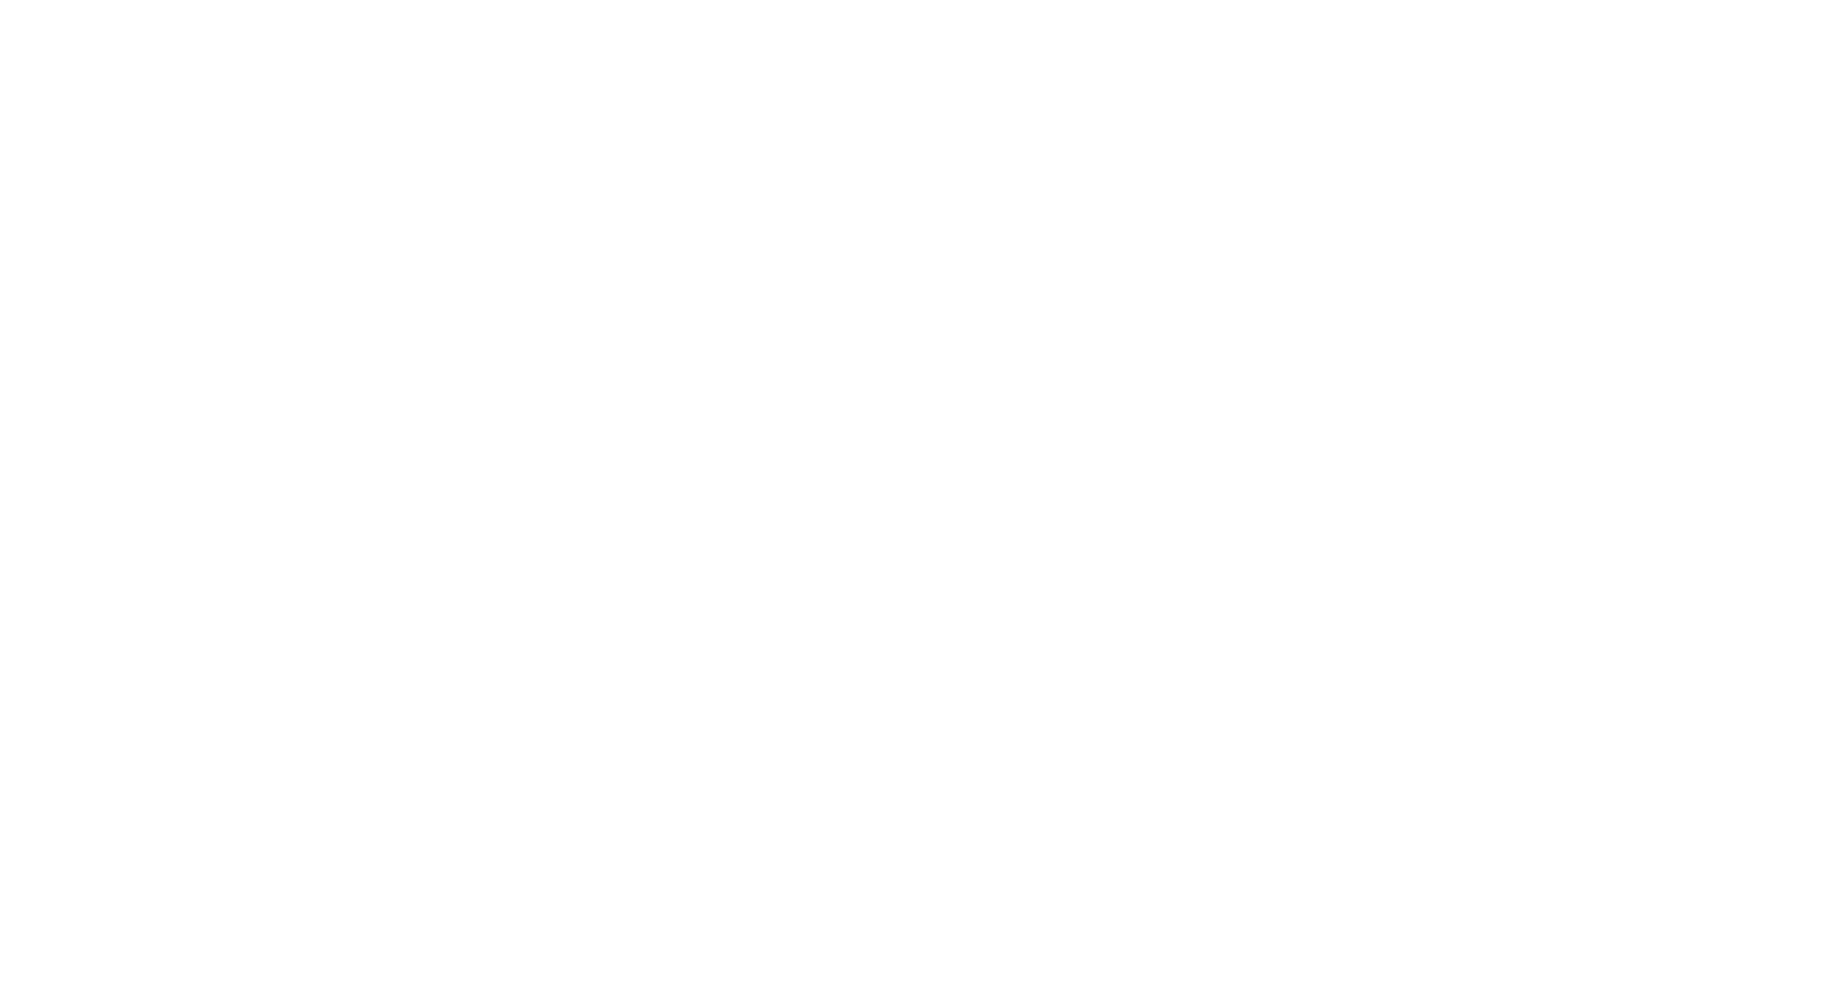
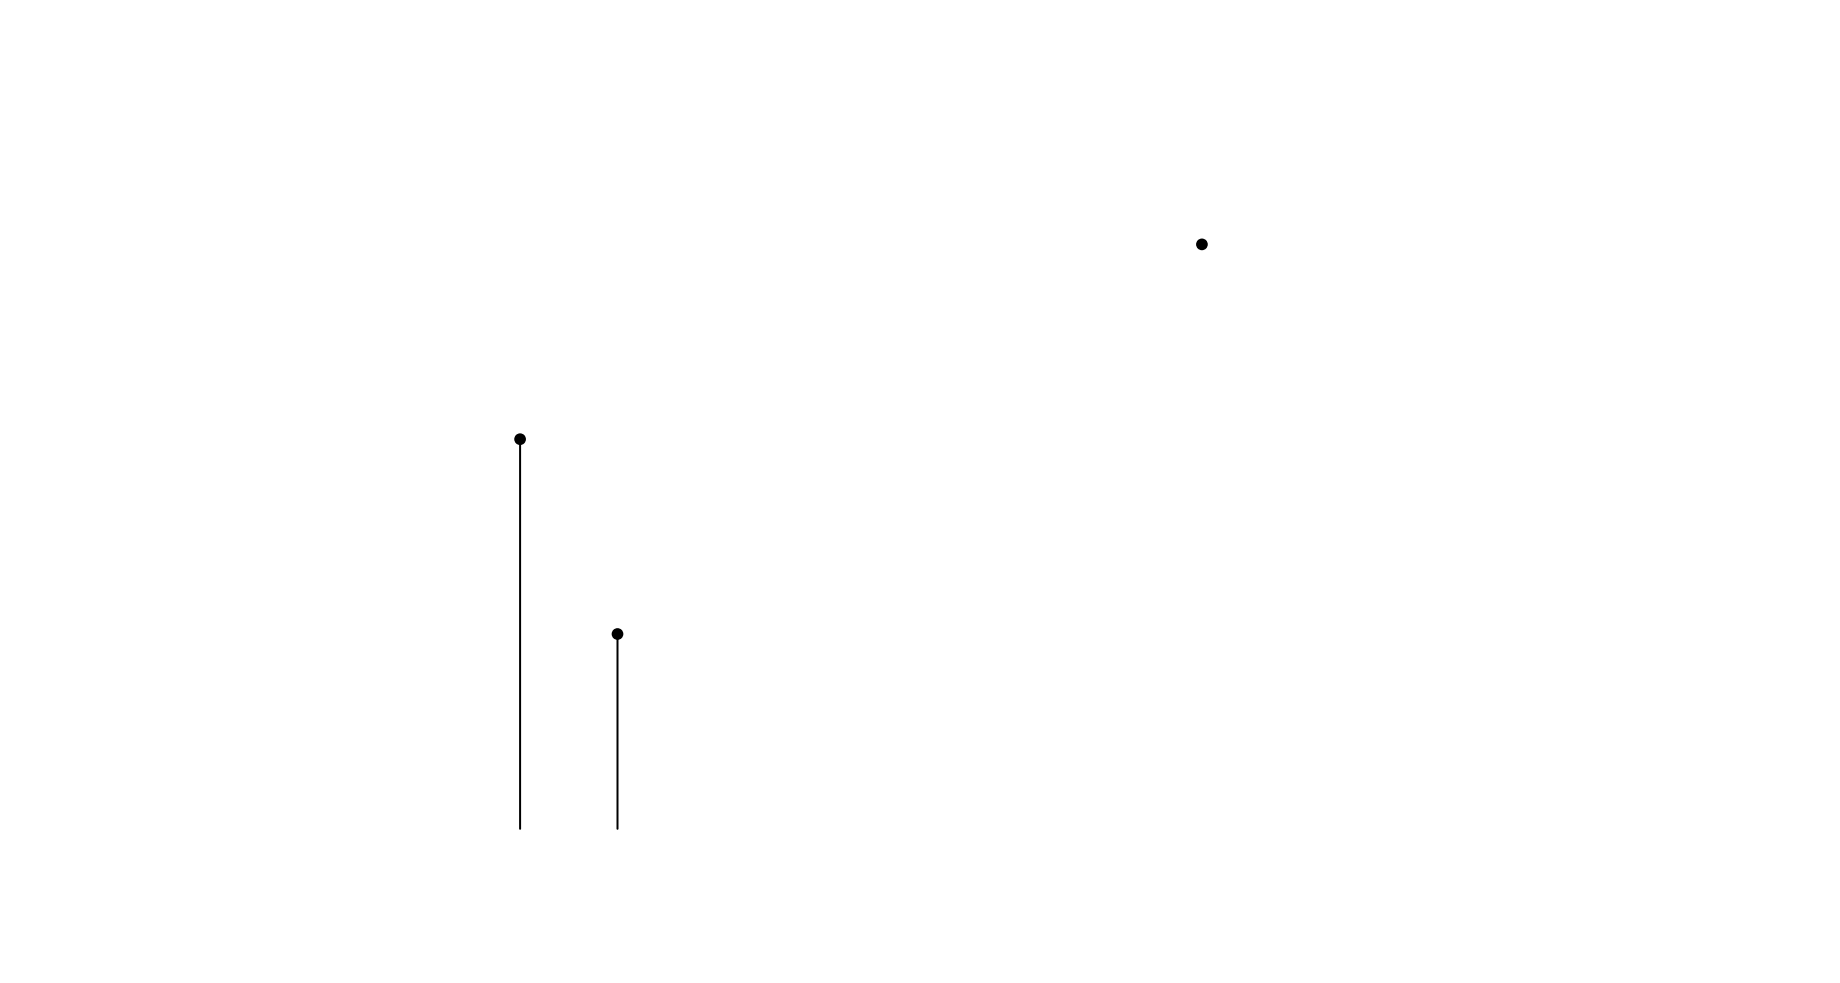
junction: none -> (1201, 244)
wire: none -> (520, 439) (520, 828)
junction: none -> (520, 439)
wire: none -> (617, 634) (617, 828)
junction: none -> (617, 634)

